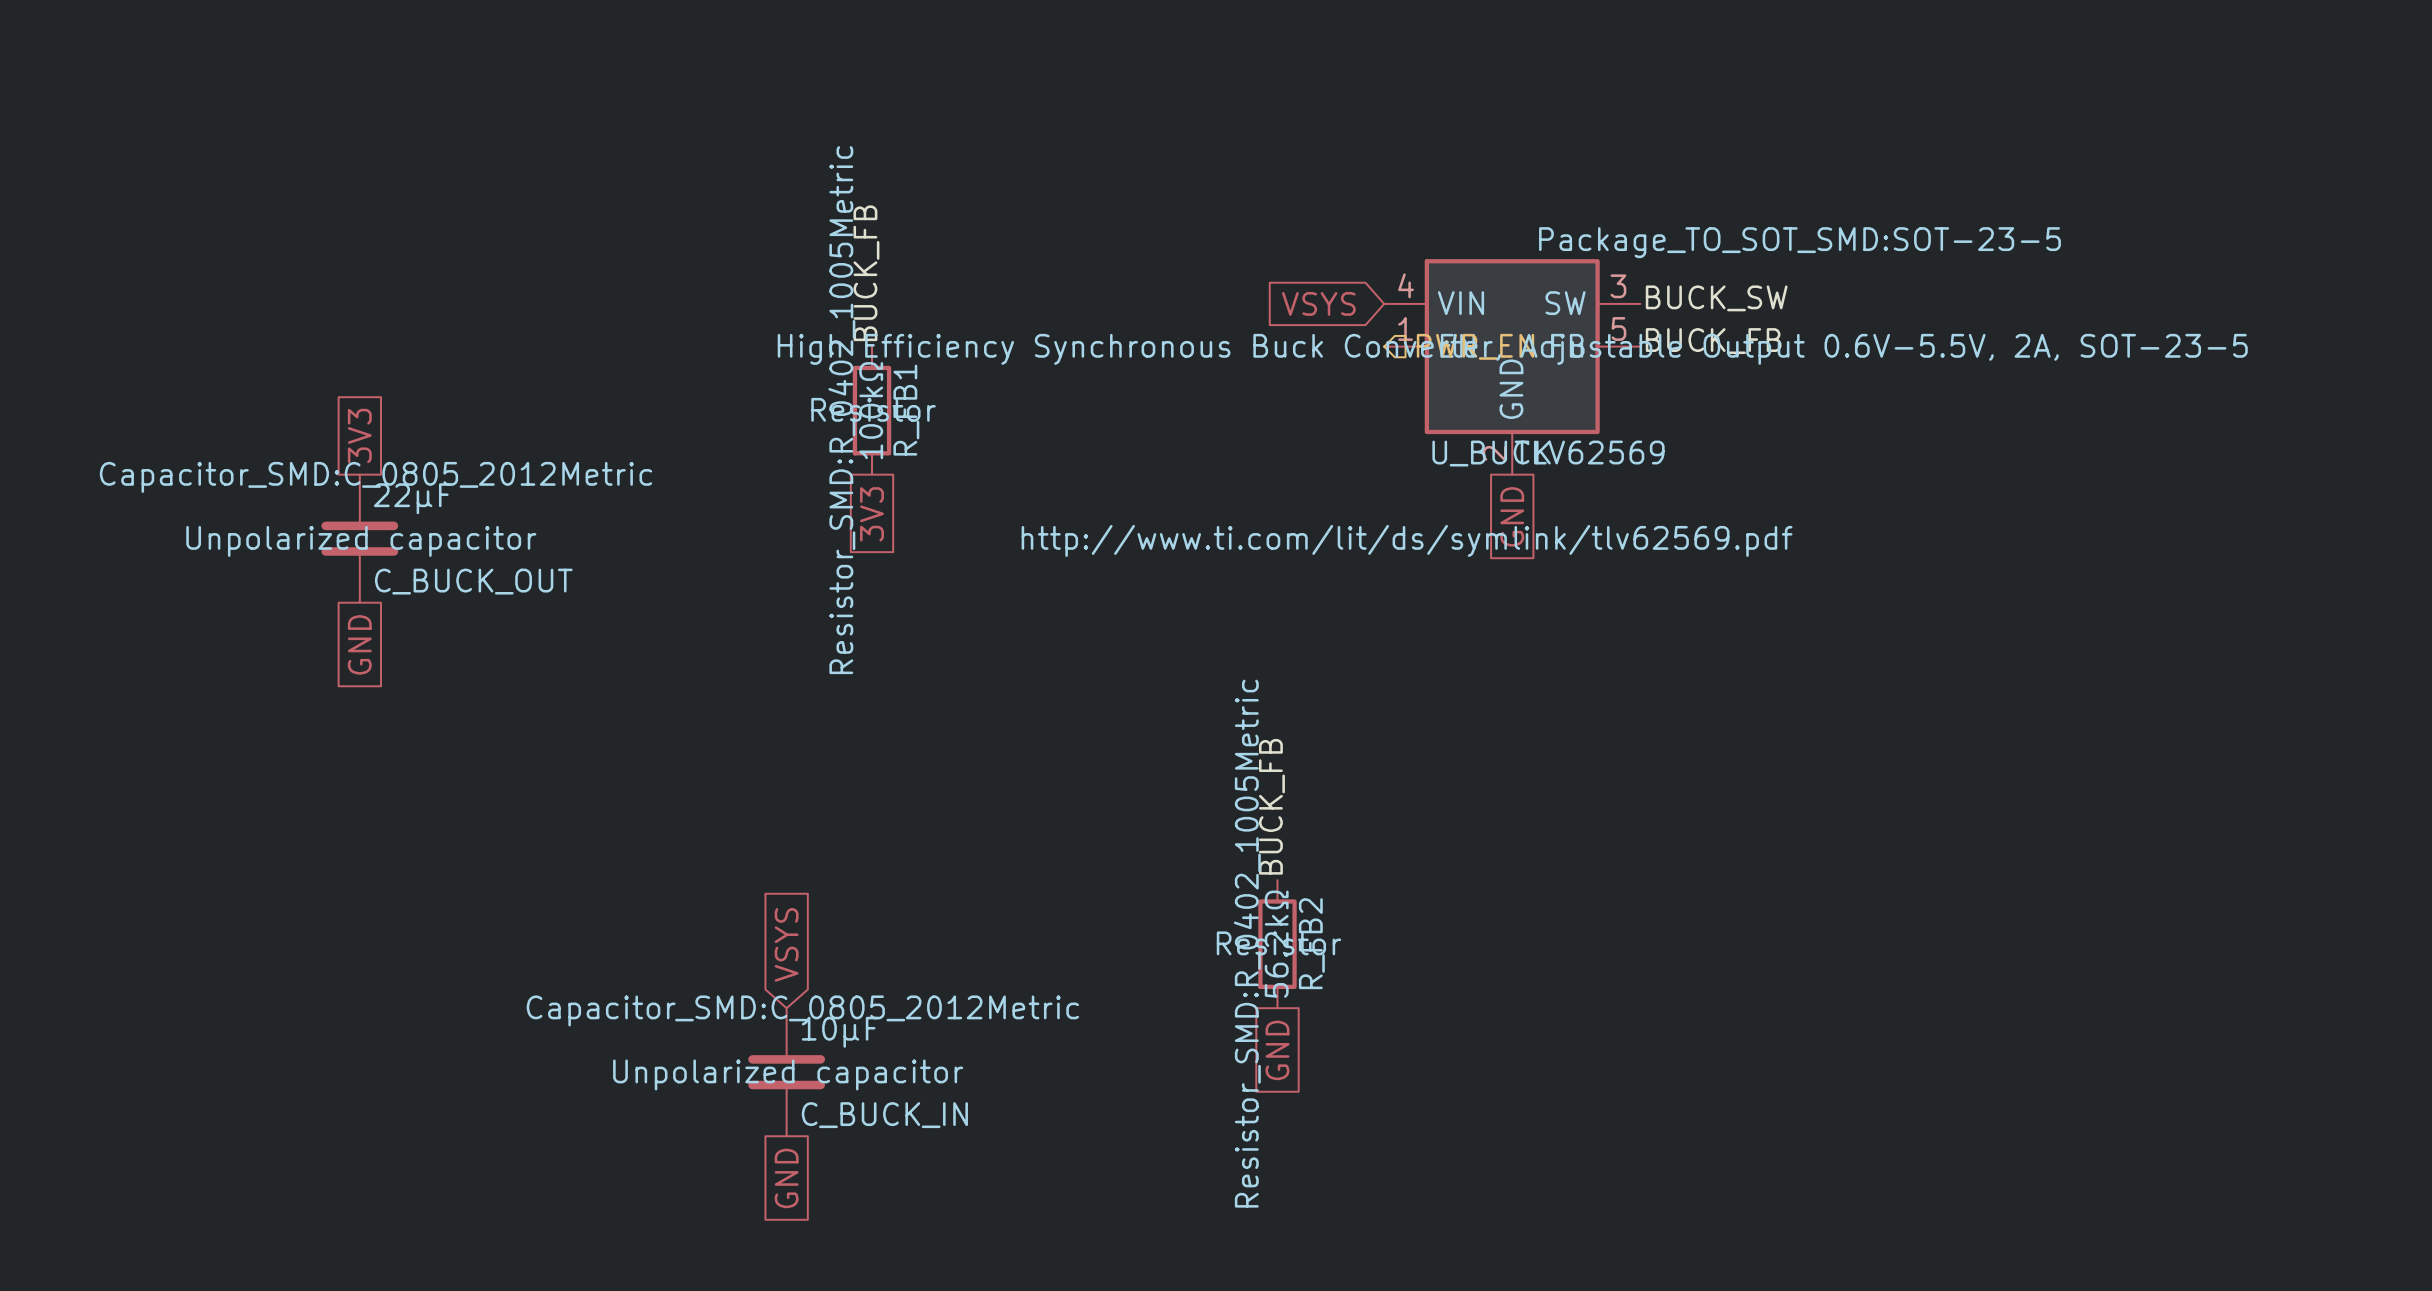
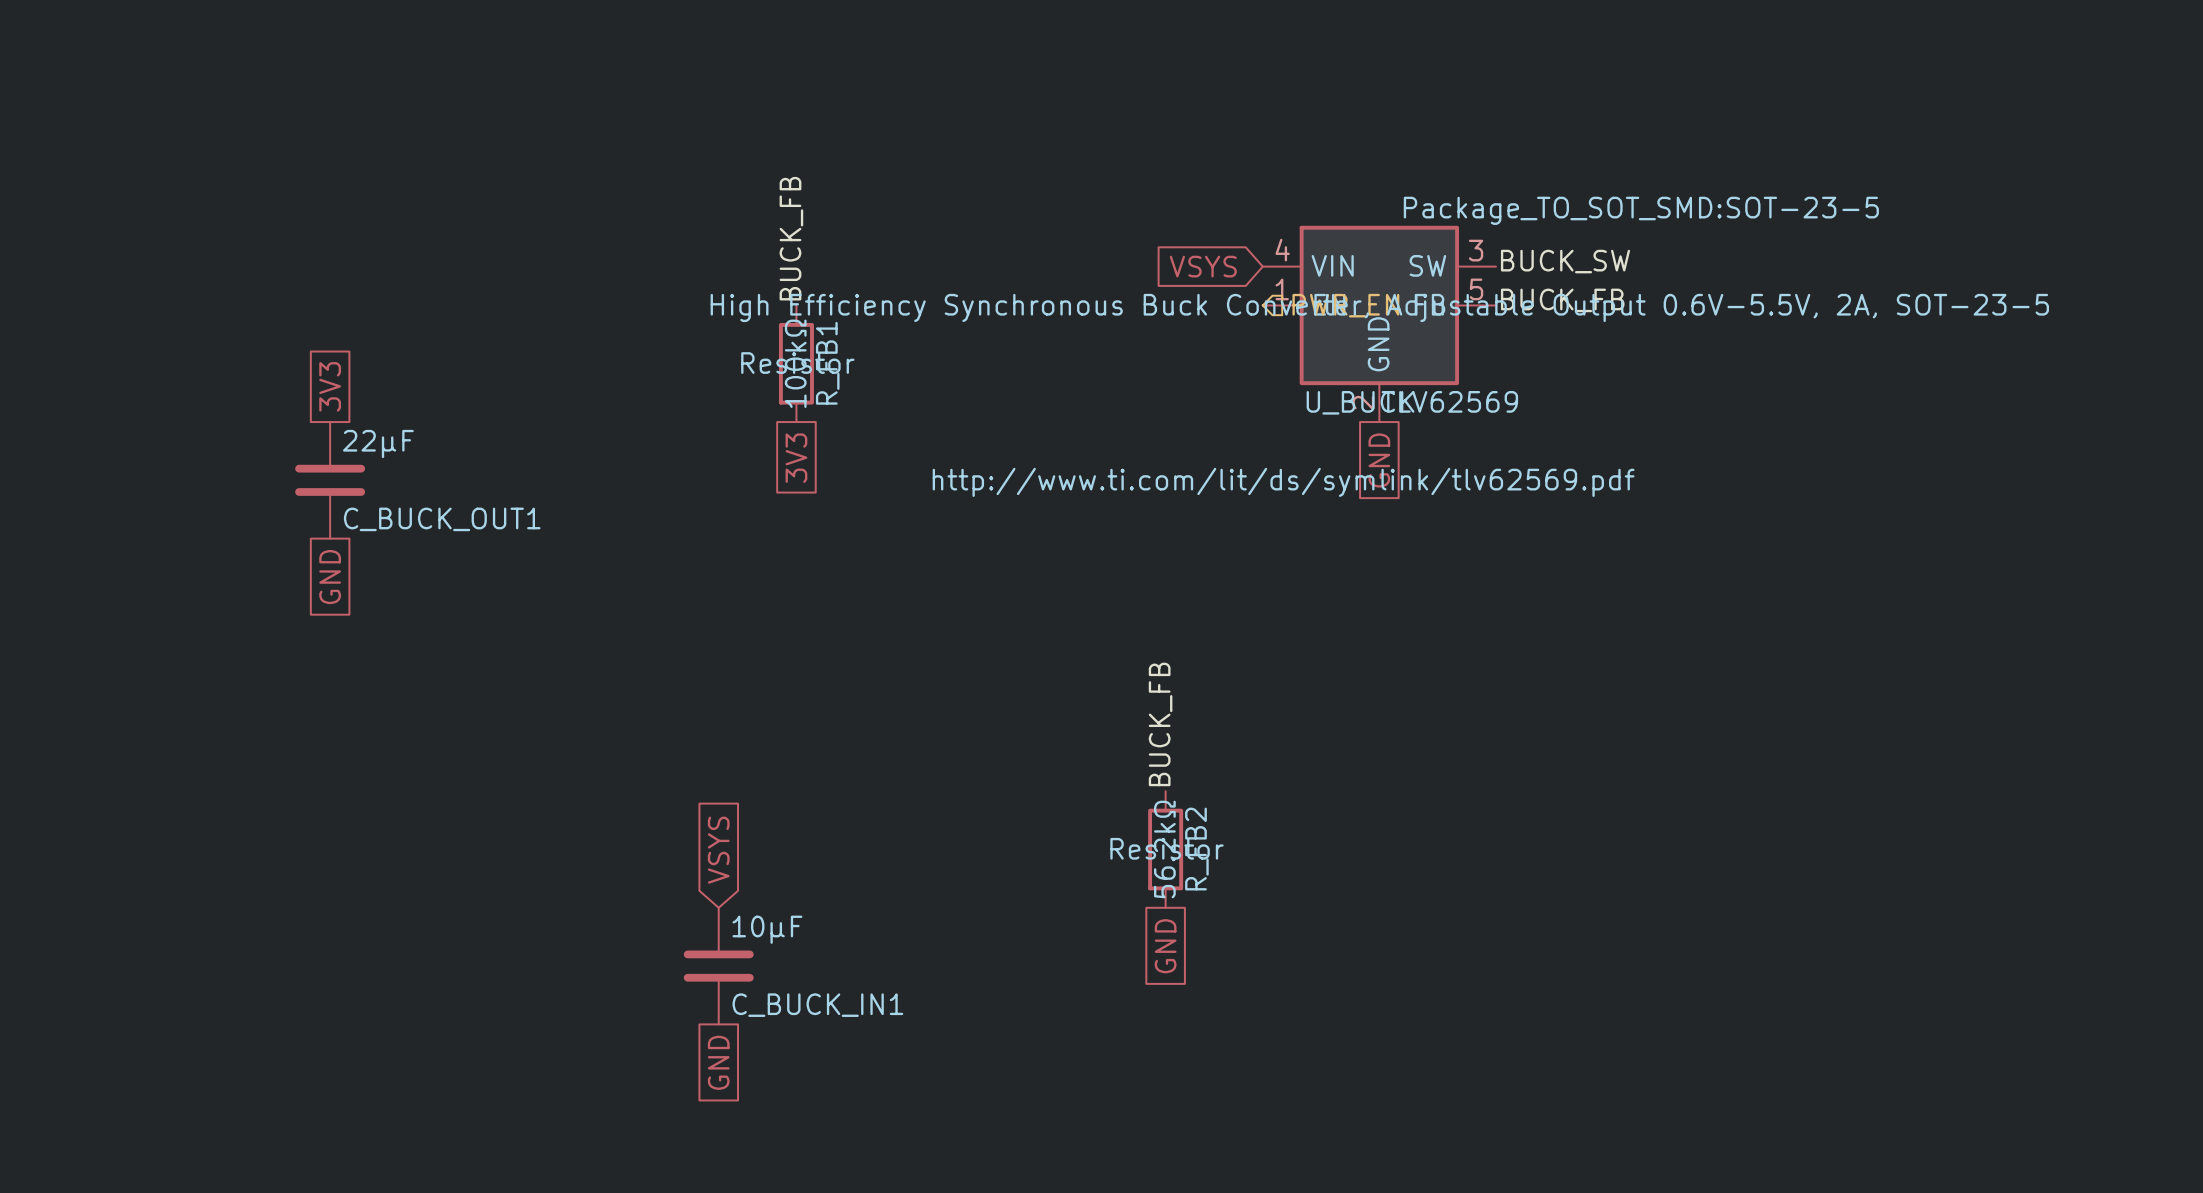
R_FB1 text: Resistor_SMD:R_0402_1005Metric (841, 410) -> none
C_BUCK_OUT text: Capacitor_SMD:C_0805_2012Metric (376, 477) -> none
C_BUCK_OUT text: Unpolarized capacitor (361, 541) -> none
C_BUCK_OUT name: C_BUCK_OUT (473, 581) -> C_BUCK_OUT1 (442, 519)
R_FB2 text: Resistor_SMD:R_0402_1005Metric (1247, 943) -> none
C_BUCK_IN text: Capacitor_SMD:C_0805_2012Metric (802, 1010) -> none
C_BUCK_IN text: Unpolarized capacitor (788, 1074) -> none
C_BUCK_IN name: C_BUCK_IN (884, 1115) -> C_BUCK_IN1 (817, 1005)

